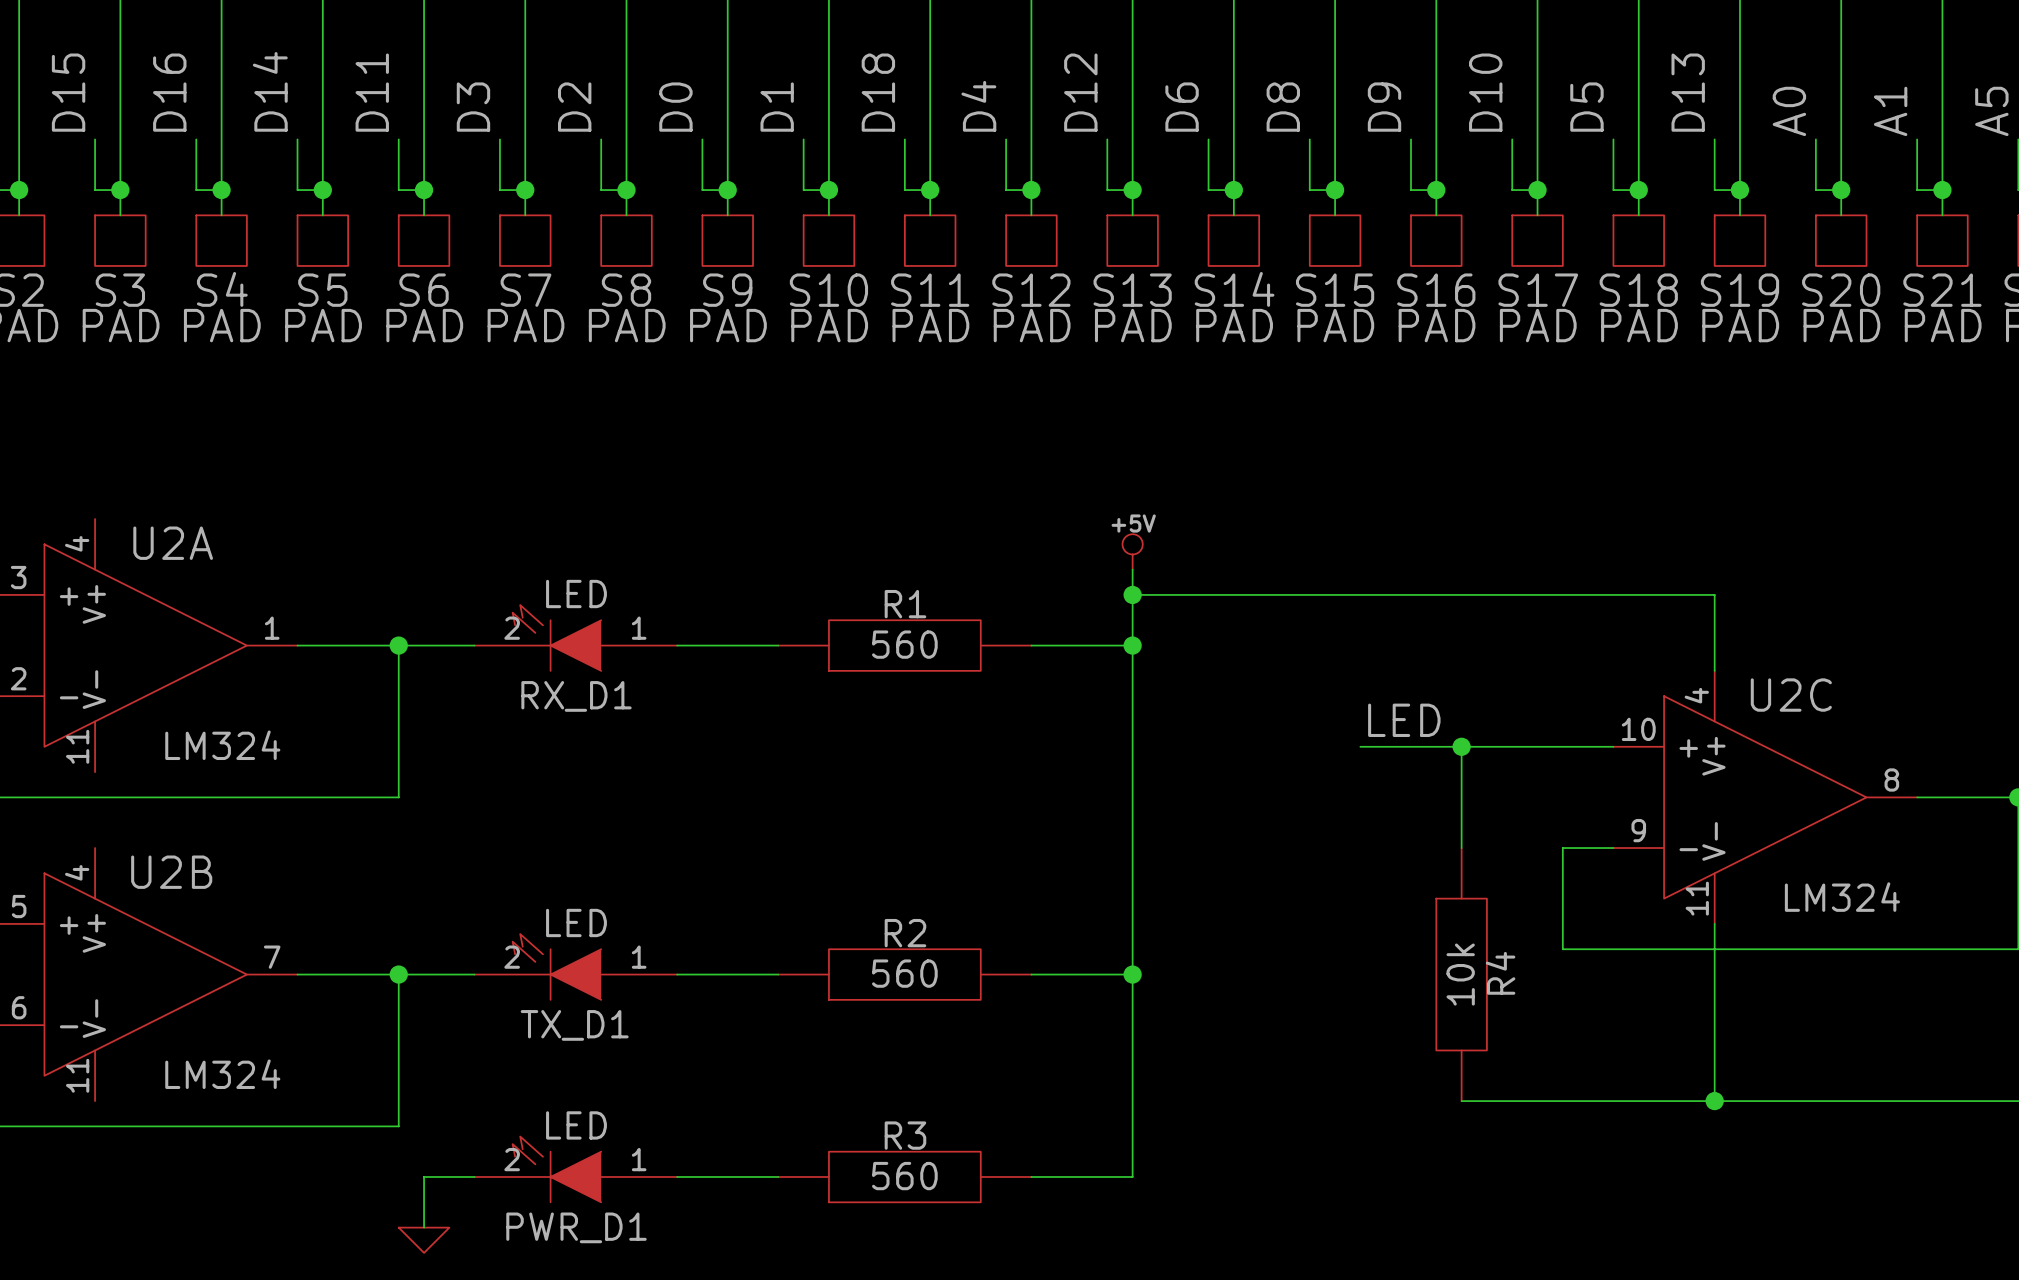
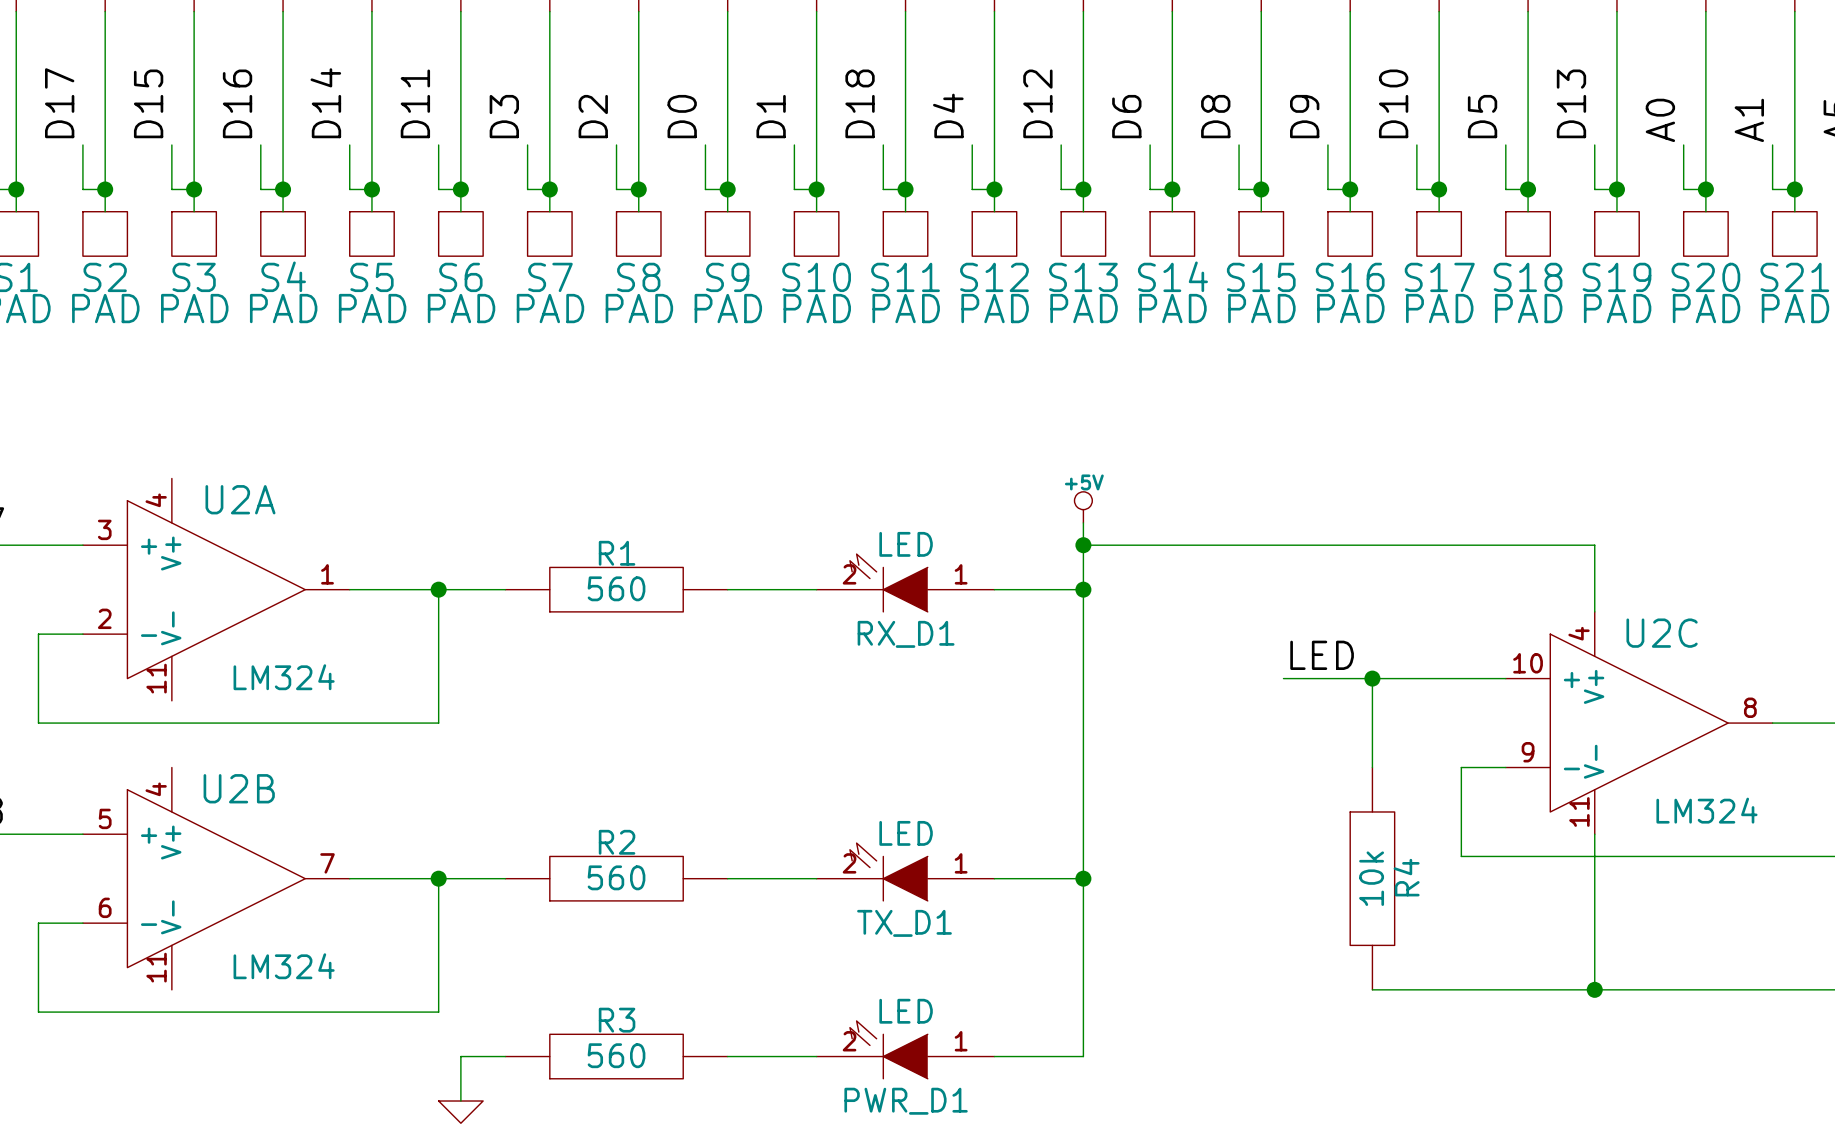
RX_D1 position: (575, 637) -> (905, 582)
R1 position: (904, 645) -> (616, 589)
TX_D1 position: (575, 966) -> (905, 872)
R2 position: (904, 974) -> (616, 878)
PWR_D1 position: (575, 1169) -> (905, 1049)
R3 position: (904, 1177) -> (616, 1056)

